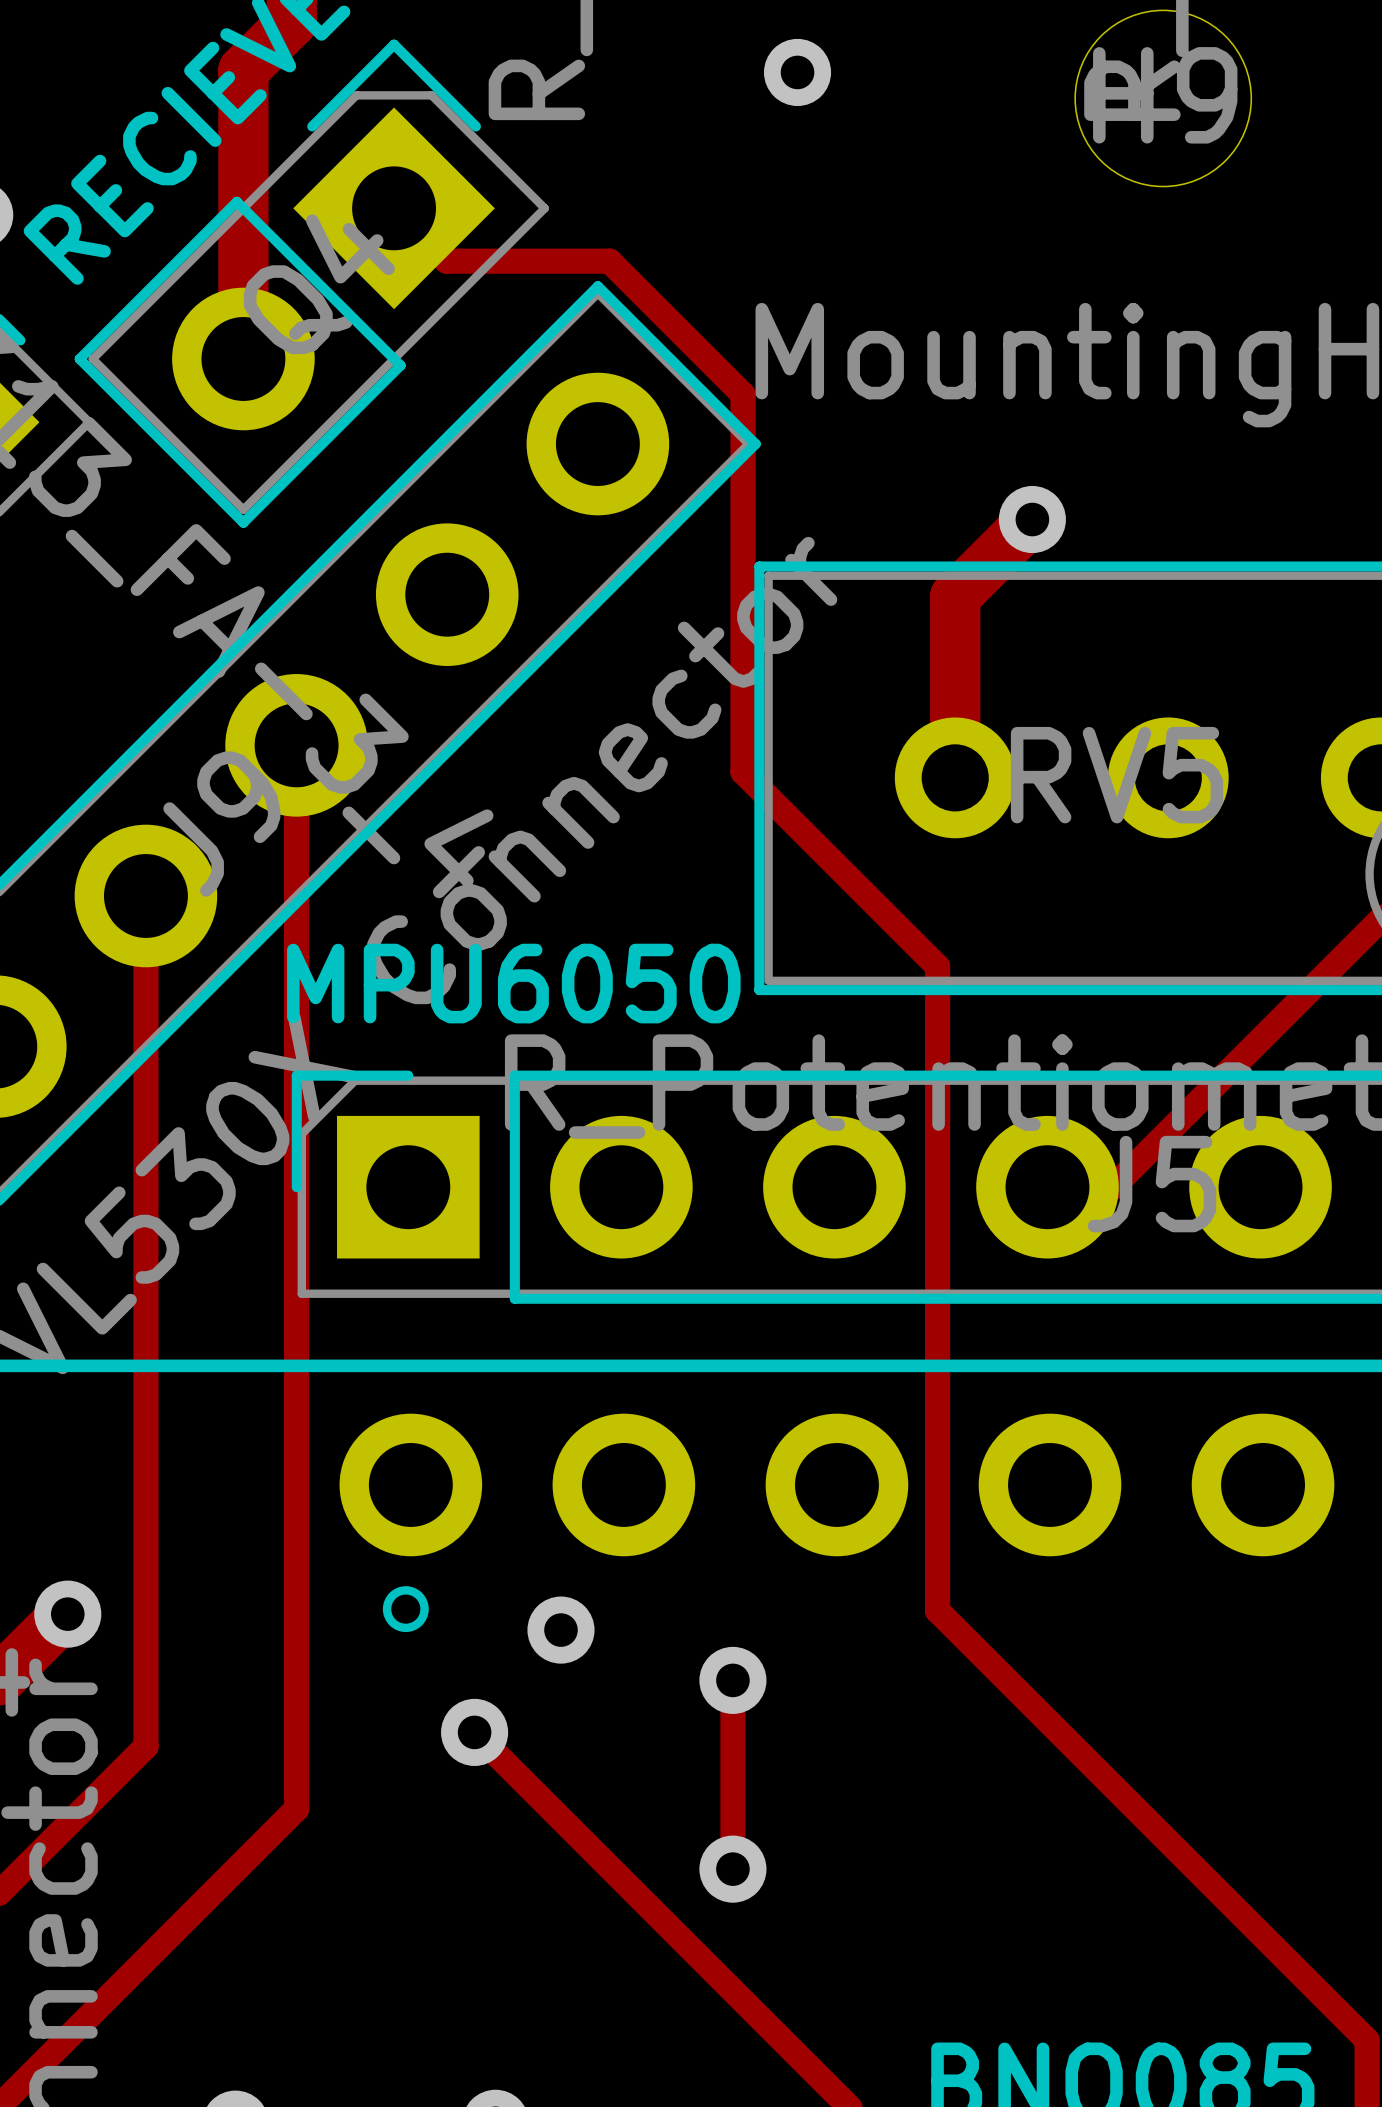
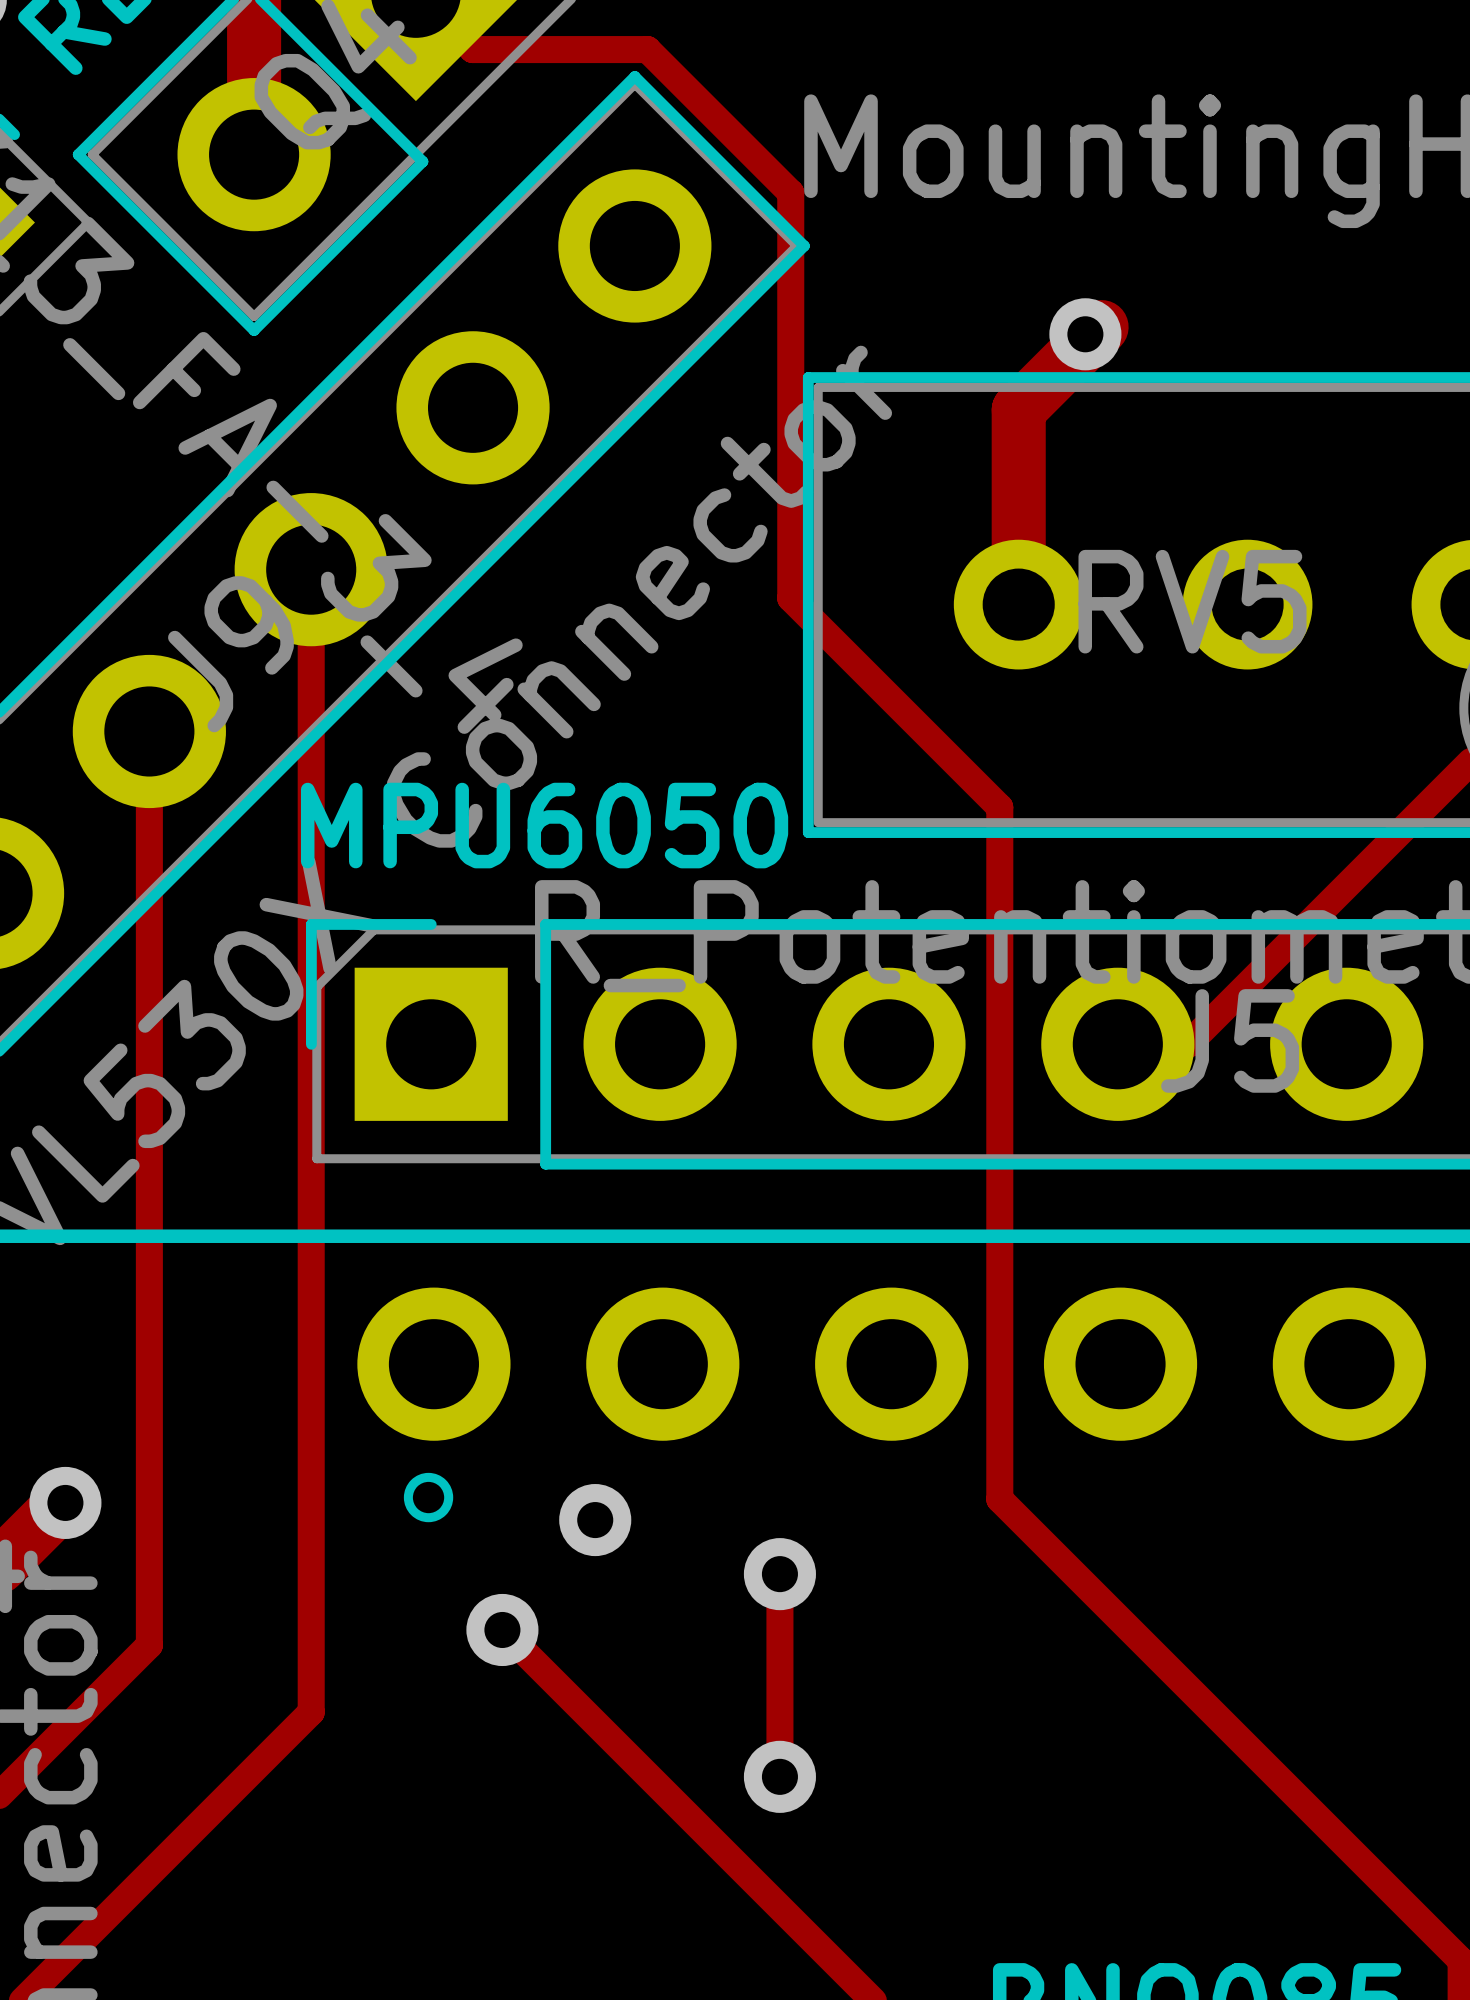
via position: (1032, 519) -> (1085, 334)

